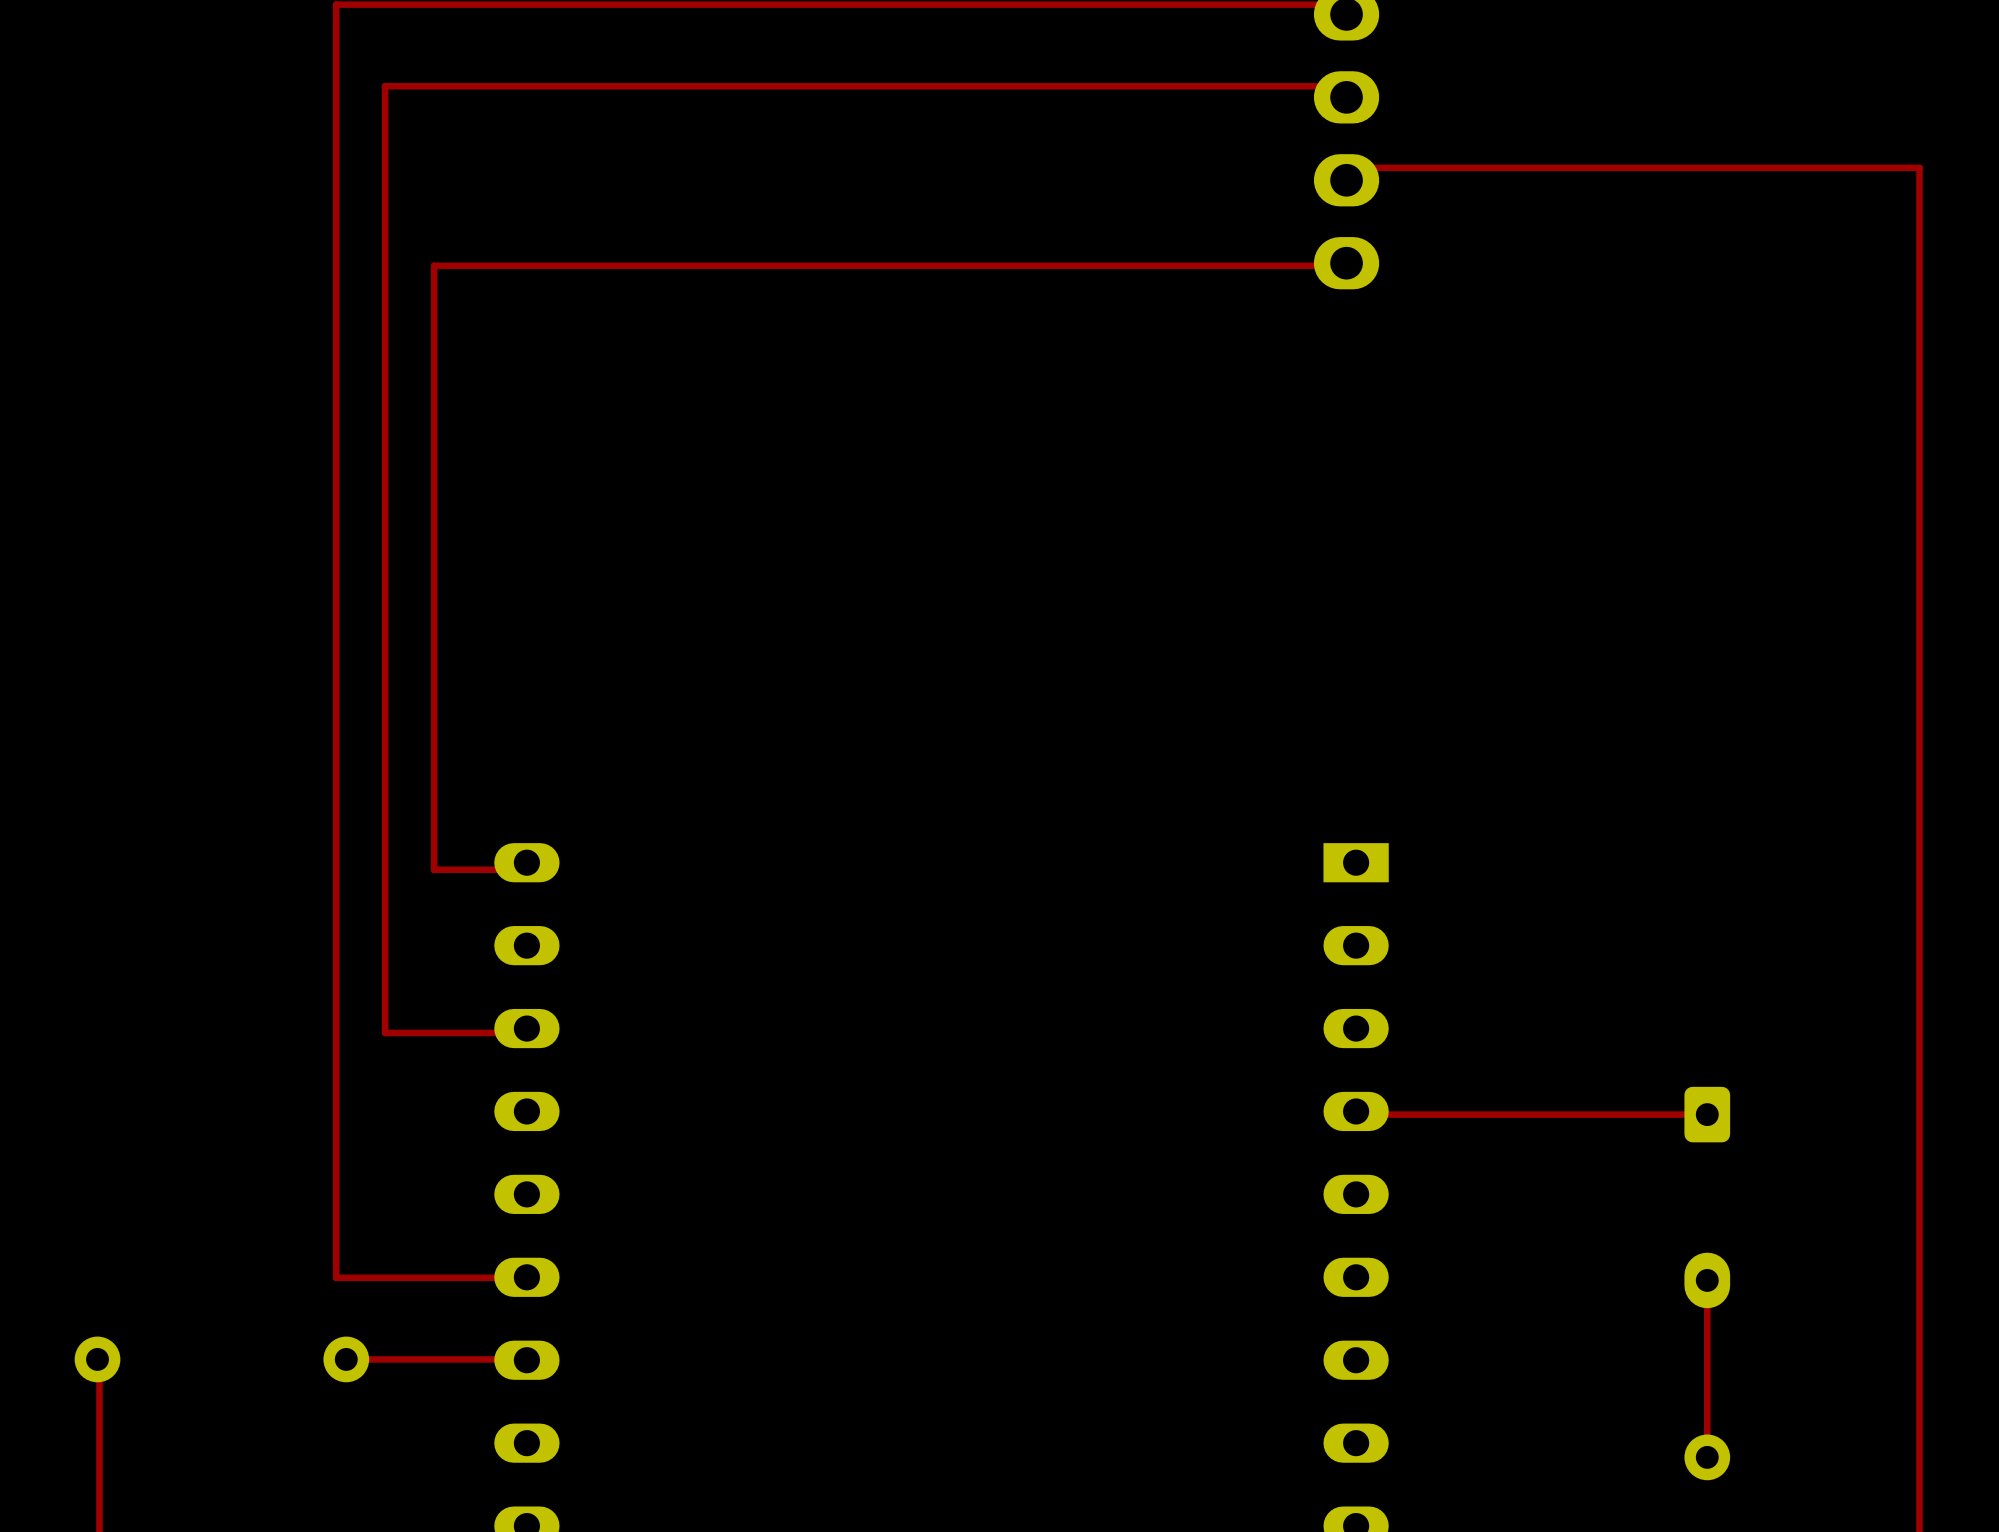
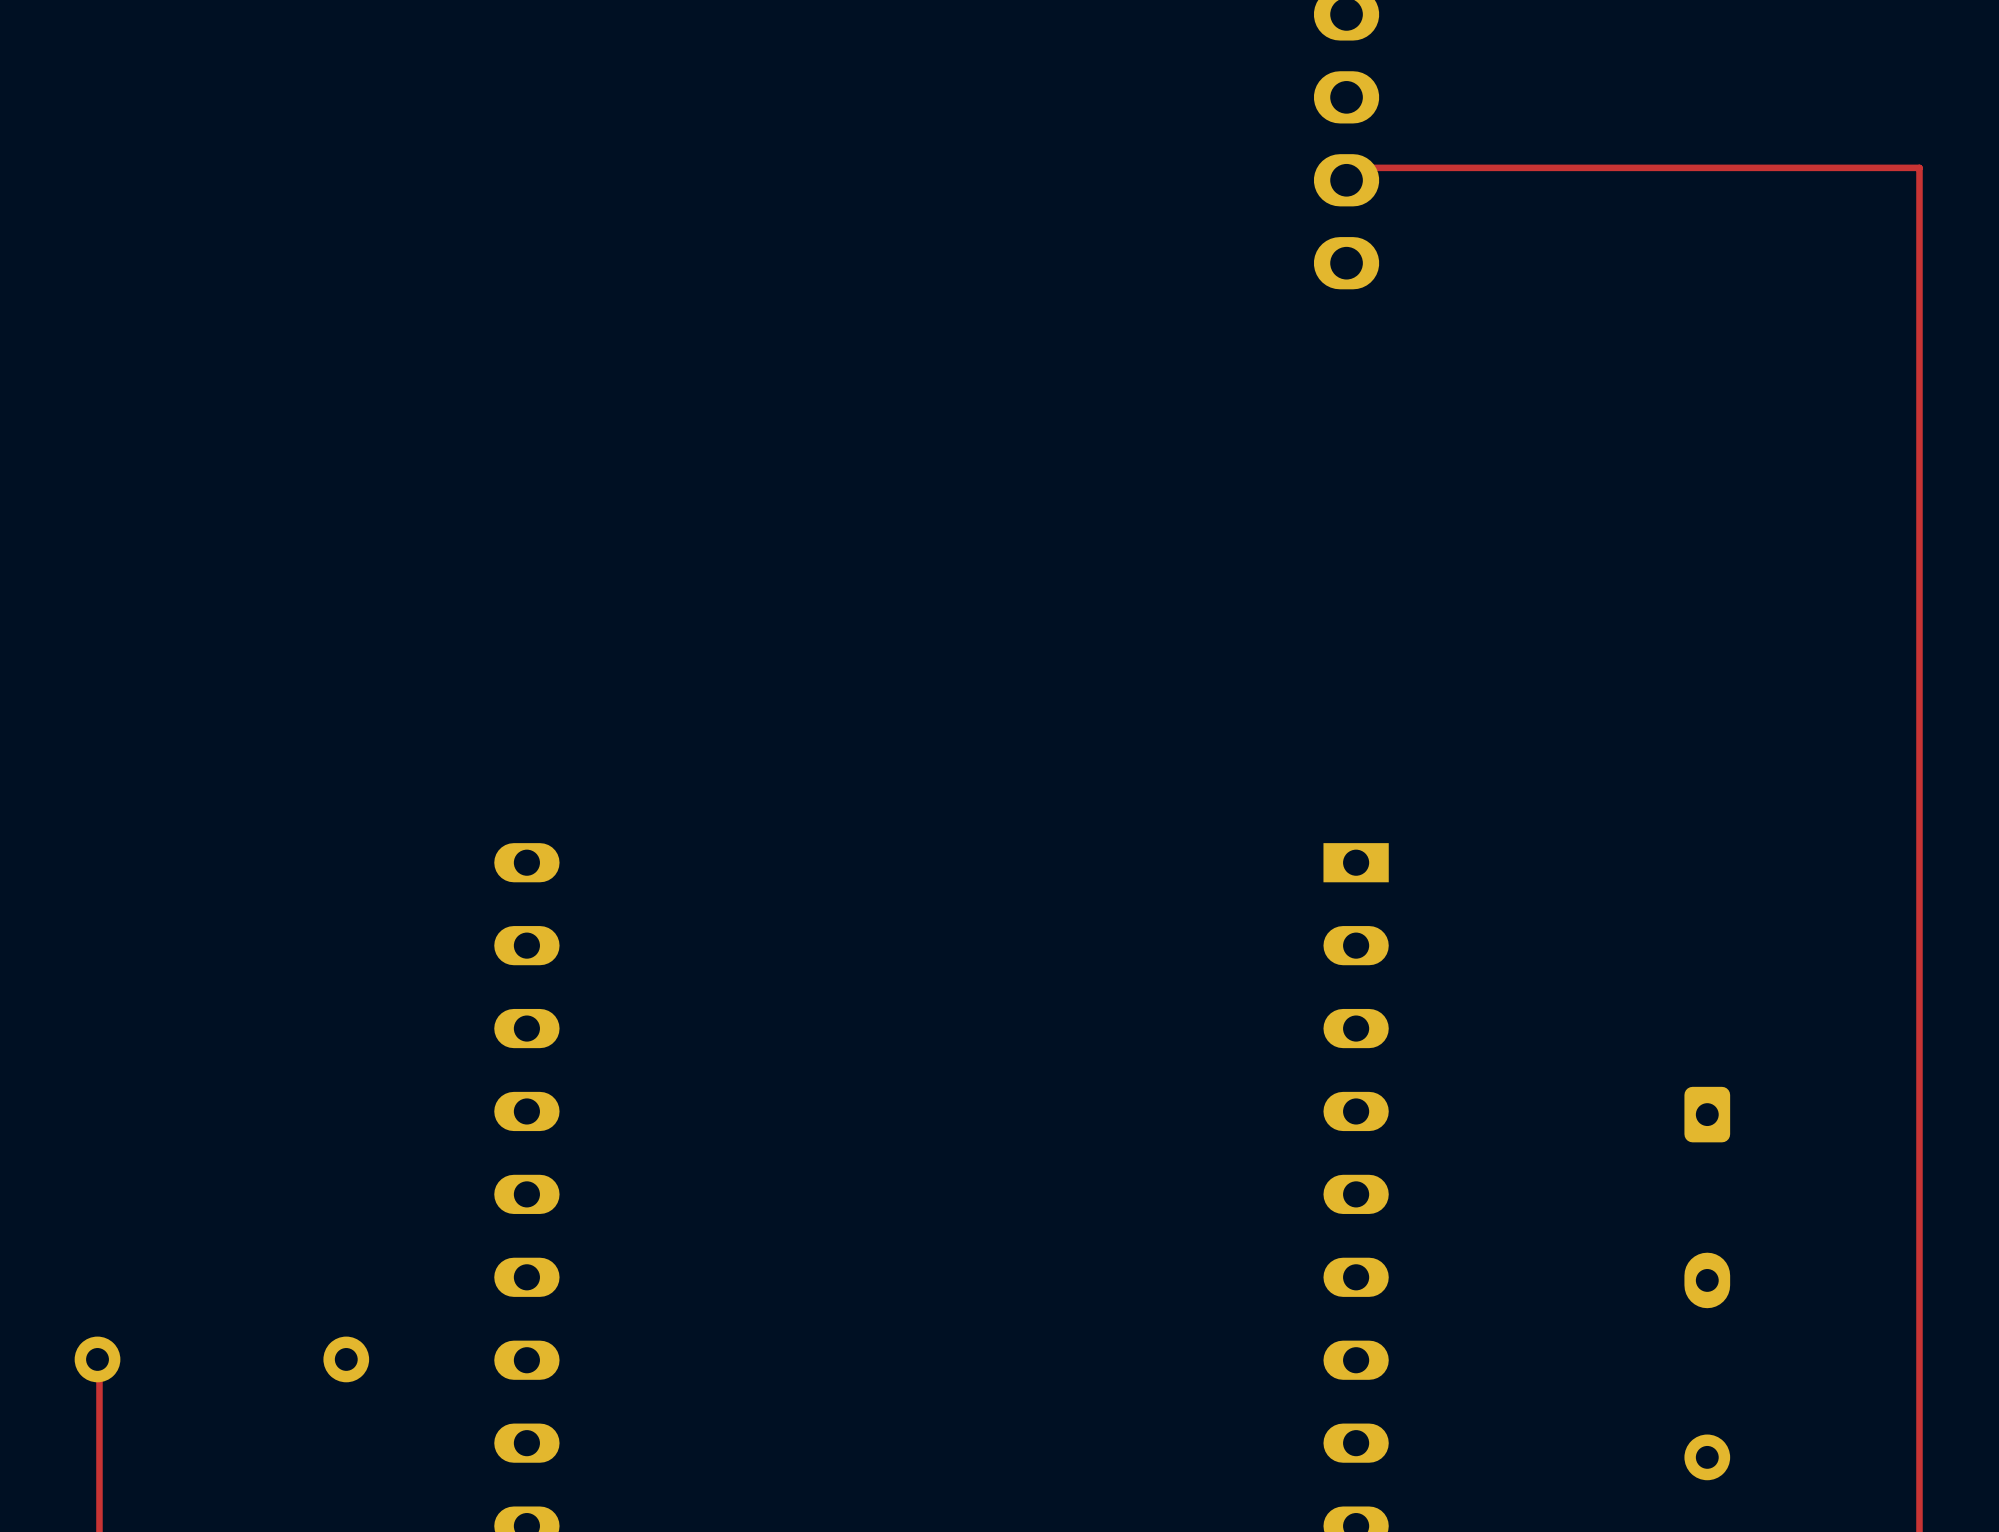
top track: (1348, 4) (336, 4) (336, 1277) (499, 1277) -> none
top track: (1331, 86) (385, 86) (385, 1032) (515, 1032) -> none
top track: (1348, 265) (434, 265) (434, 869) (532, 869) -> none
top track: (1356, 1111) (1359, 1114) (1707, 1114) -> none
top track: (1707, 1280) (1707, 1457) -> none
top track: (346, 1359) (526, 1360) -> none

